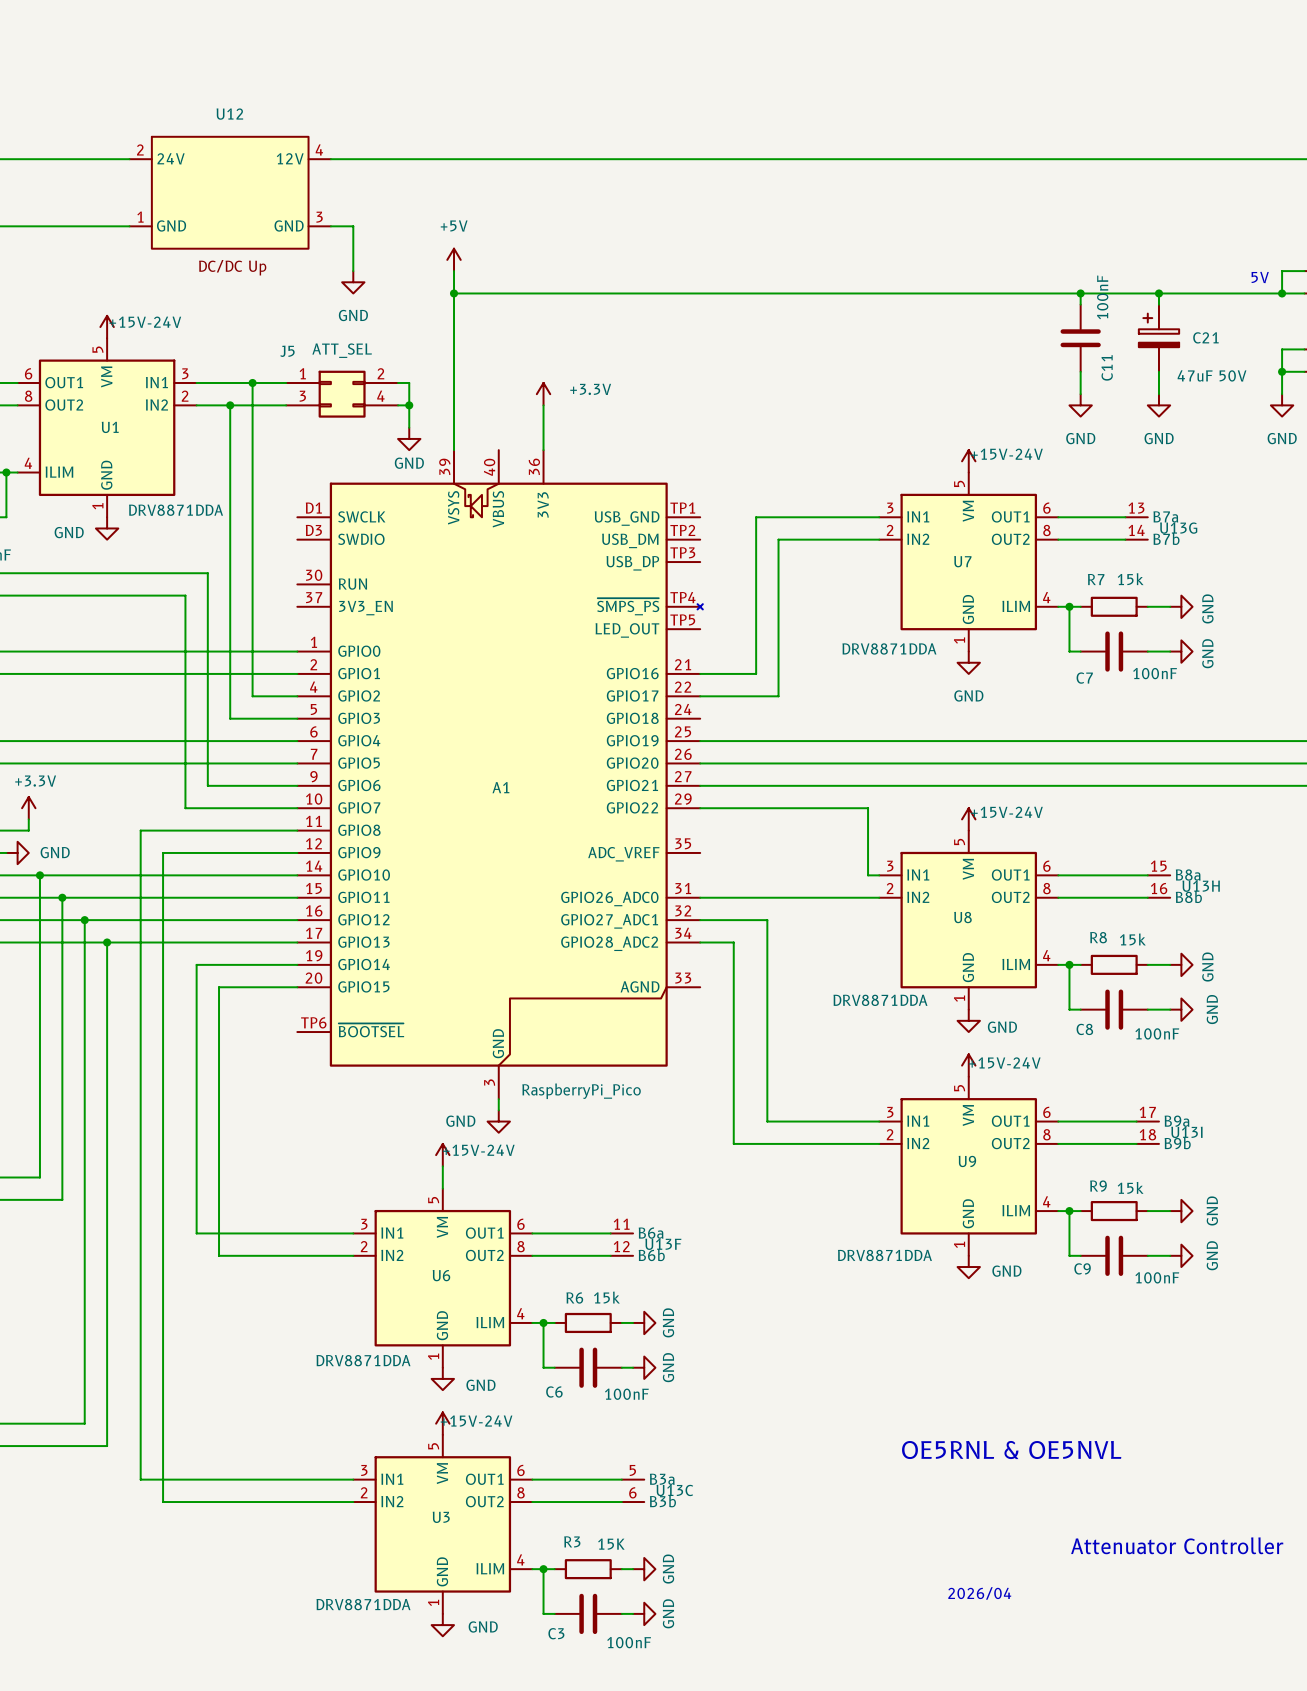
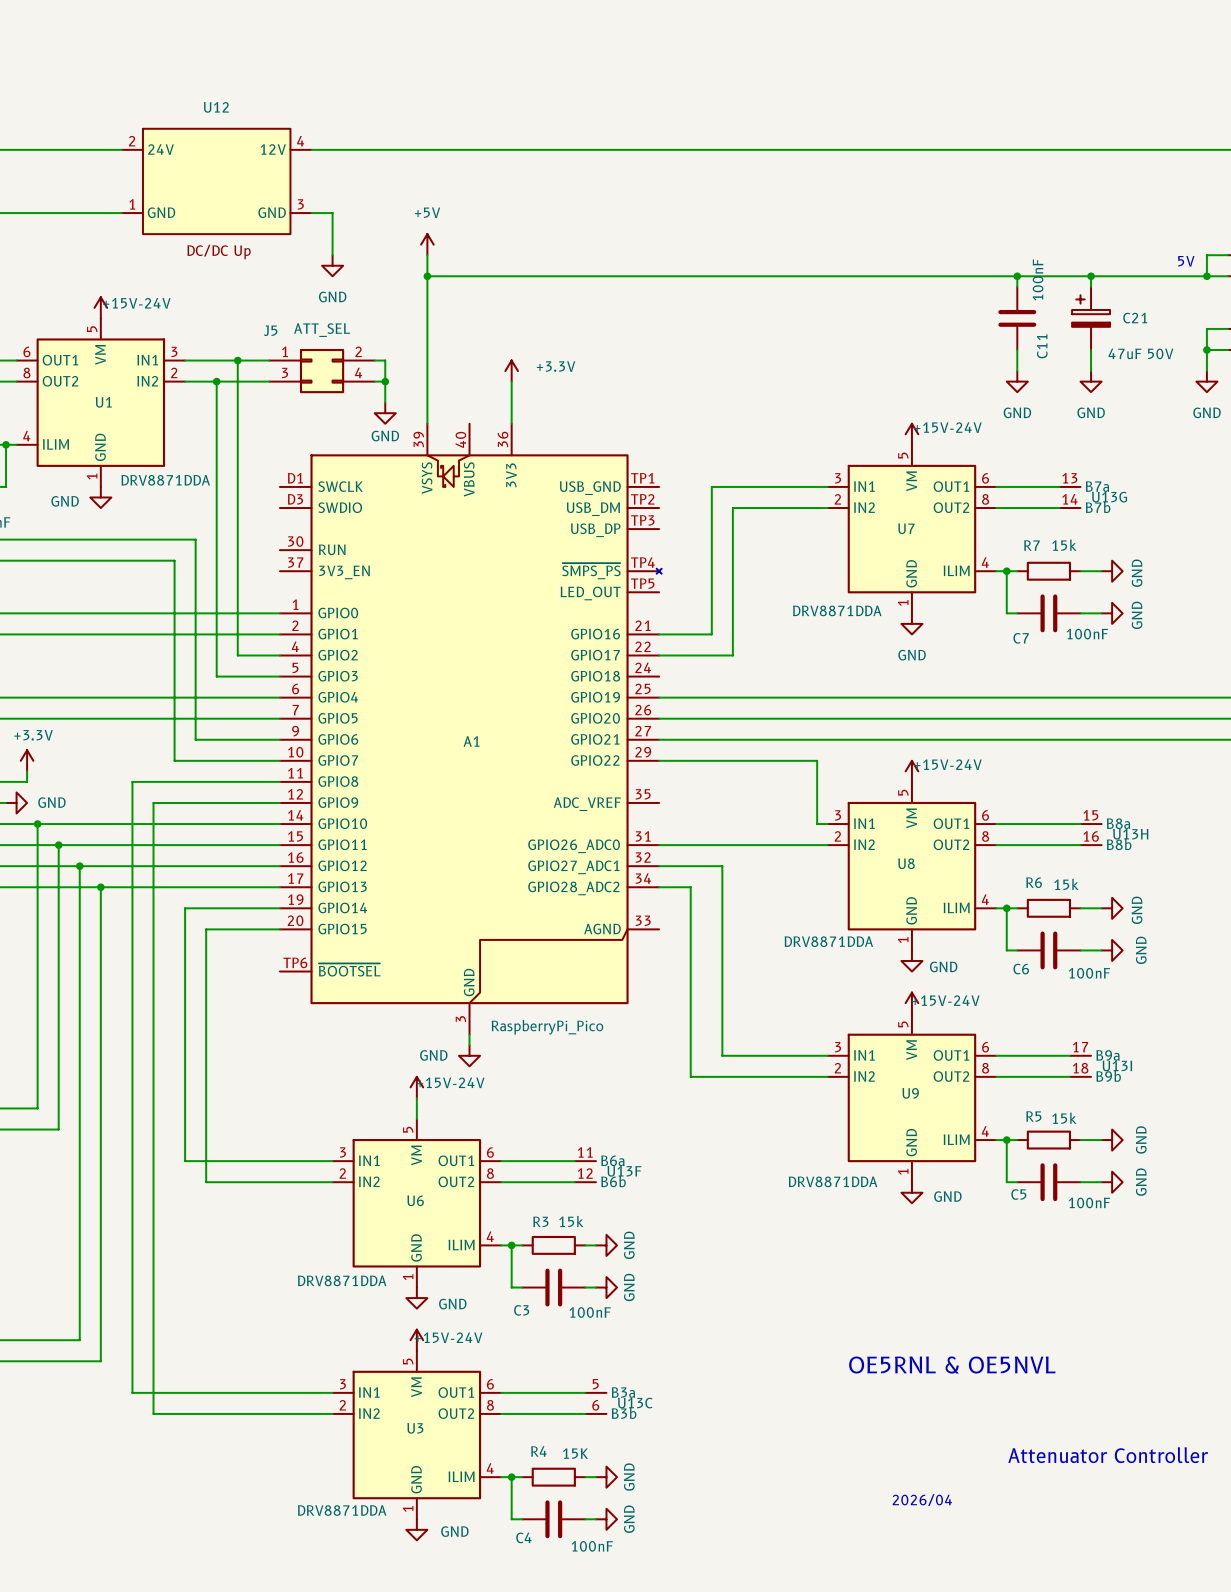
R8 name: R8 (1098, 937) -> R6 (1034, 882)
C8 name: C8 (1084, 1029) -> C6 (1021, 969)
R9 name: R9 (1098, 1186) -> R5 (1033, 1116)
C9 name: C9 (1082, 1268) -> C5 (1018, 1194)
R6 name: R6 (574, 1298) -> R3 (540, 1221)
C6 name: C6 (554, 1392) -> C3 (521, 1310)
R3 name: R3 (572, 1541) -> R4 (538, 1451)
C3 name: C3 (556, 1633) -> C4 (523, 1537)

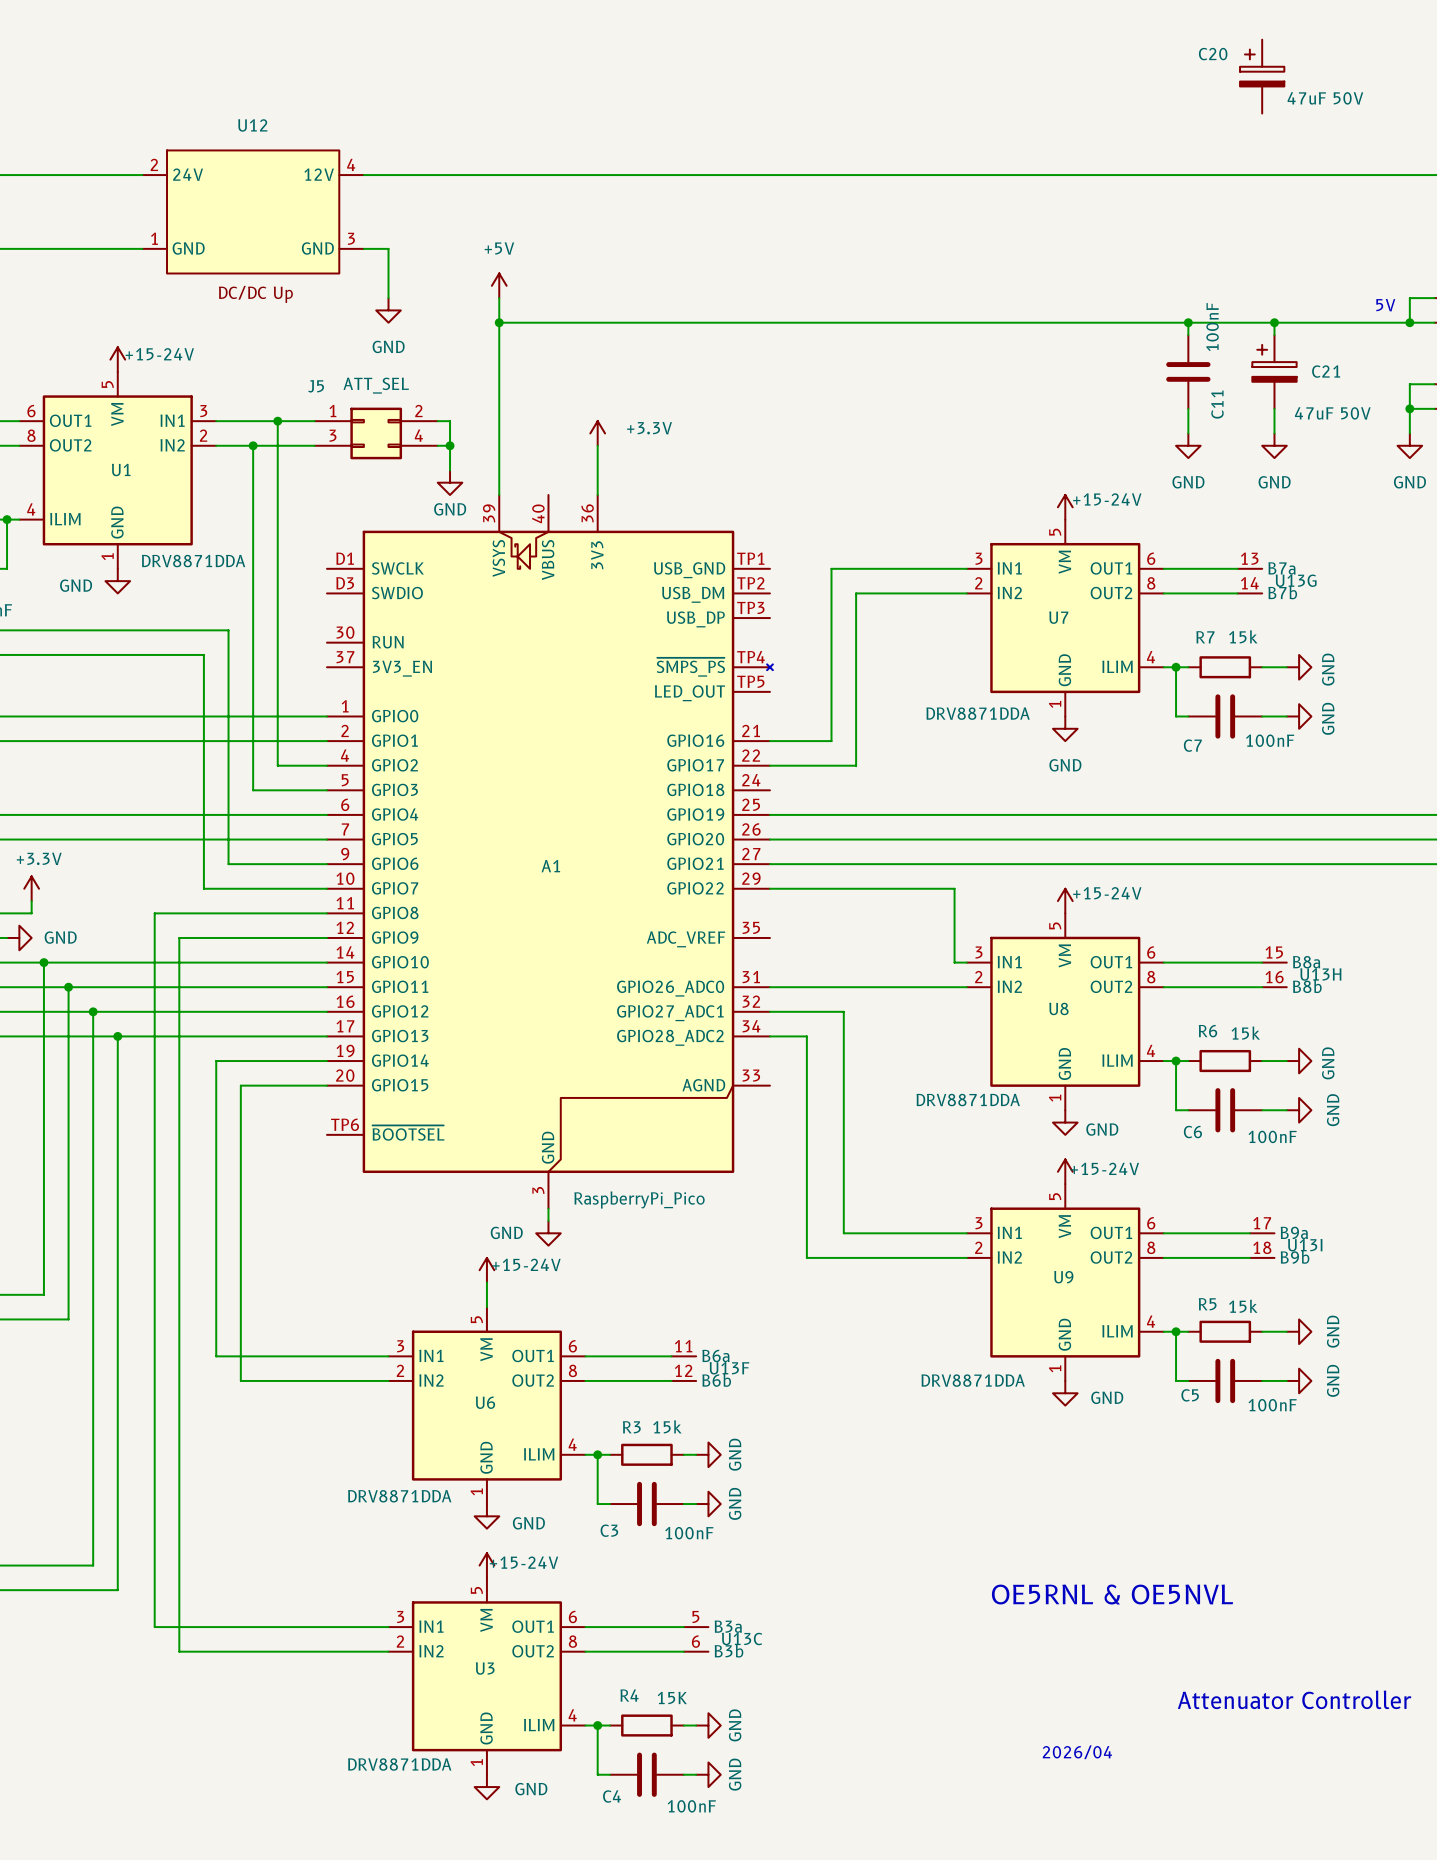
C20: none -> 47uF 50V (1262, 76)
power symbol: +15V-24V (100, 307) -> +15-24V (117, 359)
power symbol: +15V-24V (911, 434) -> +15-24V (1065, 507)
power symbol: +15V-24V (911, 771) -> +15-24V (1065, 901)
power symbol: +15V-24V (911, 1003) -> +15-24V (1065, 1171)
power symbol: +15V-24V (416, 1087) -> +15-24V (486, 1270)
power symbol: +15V-24V (416, 1340) -> +15-24V (486, 1565)

